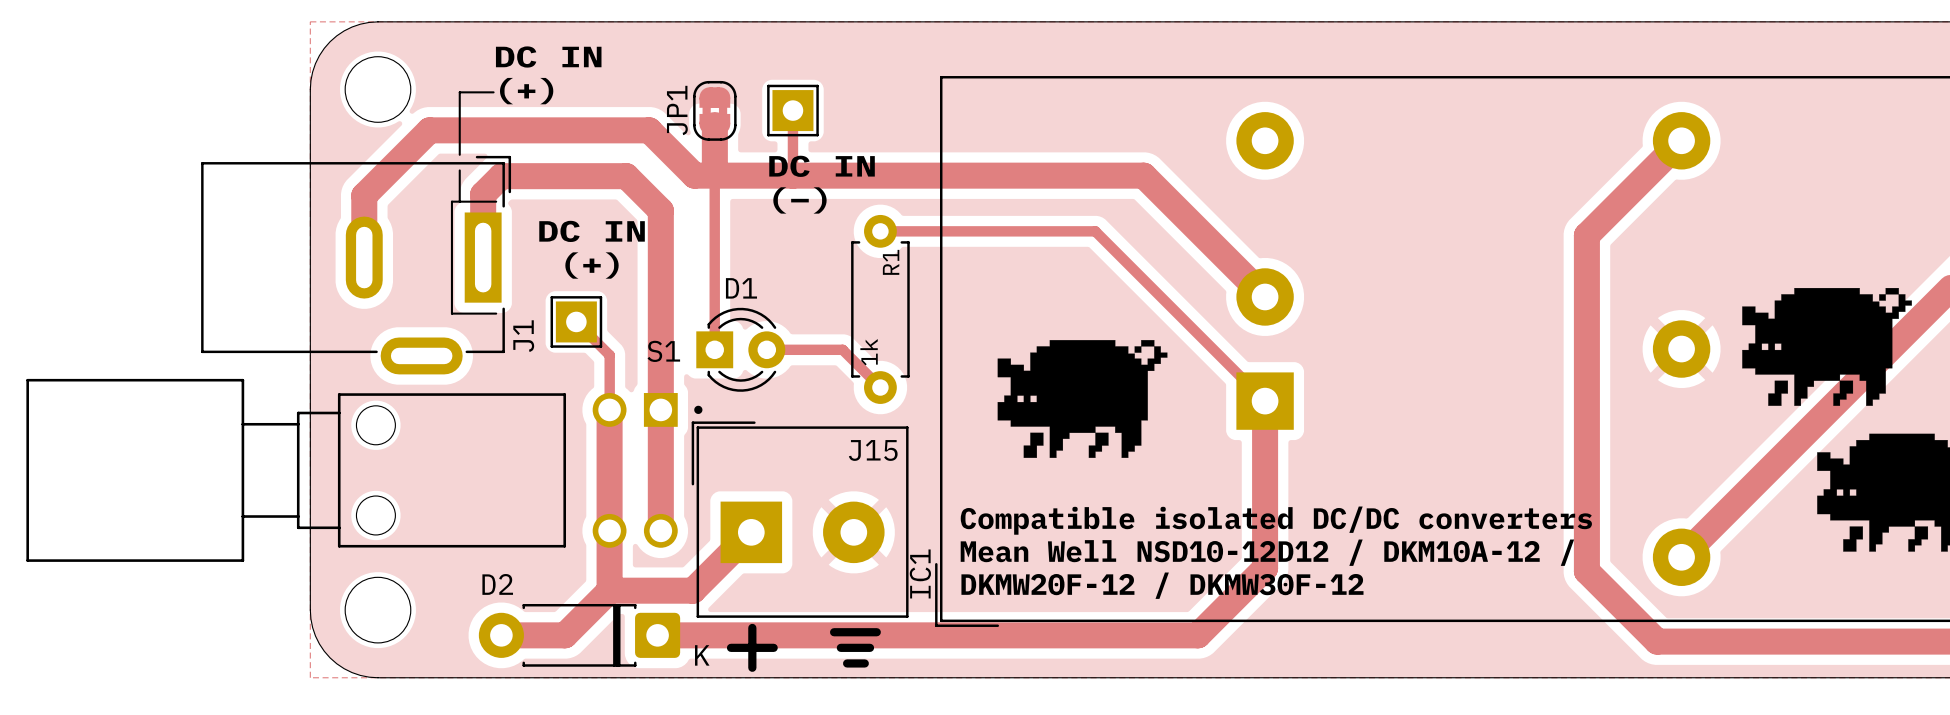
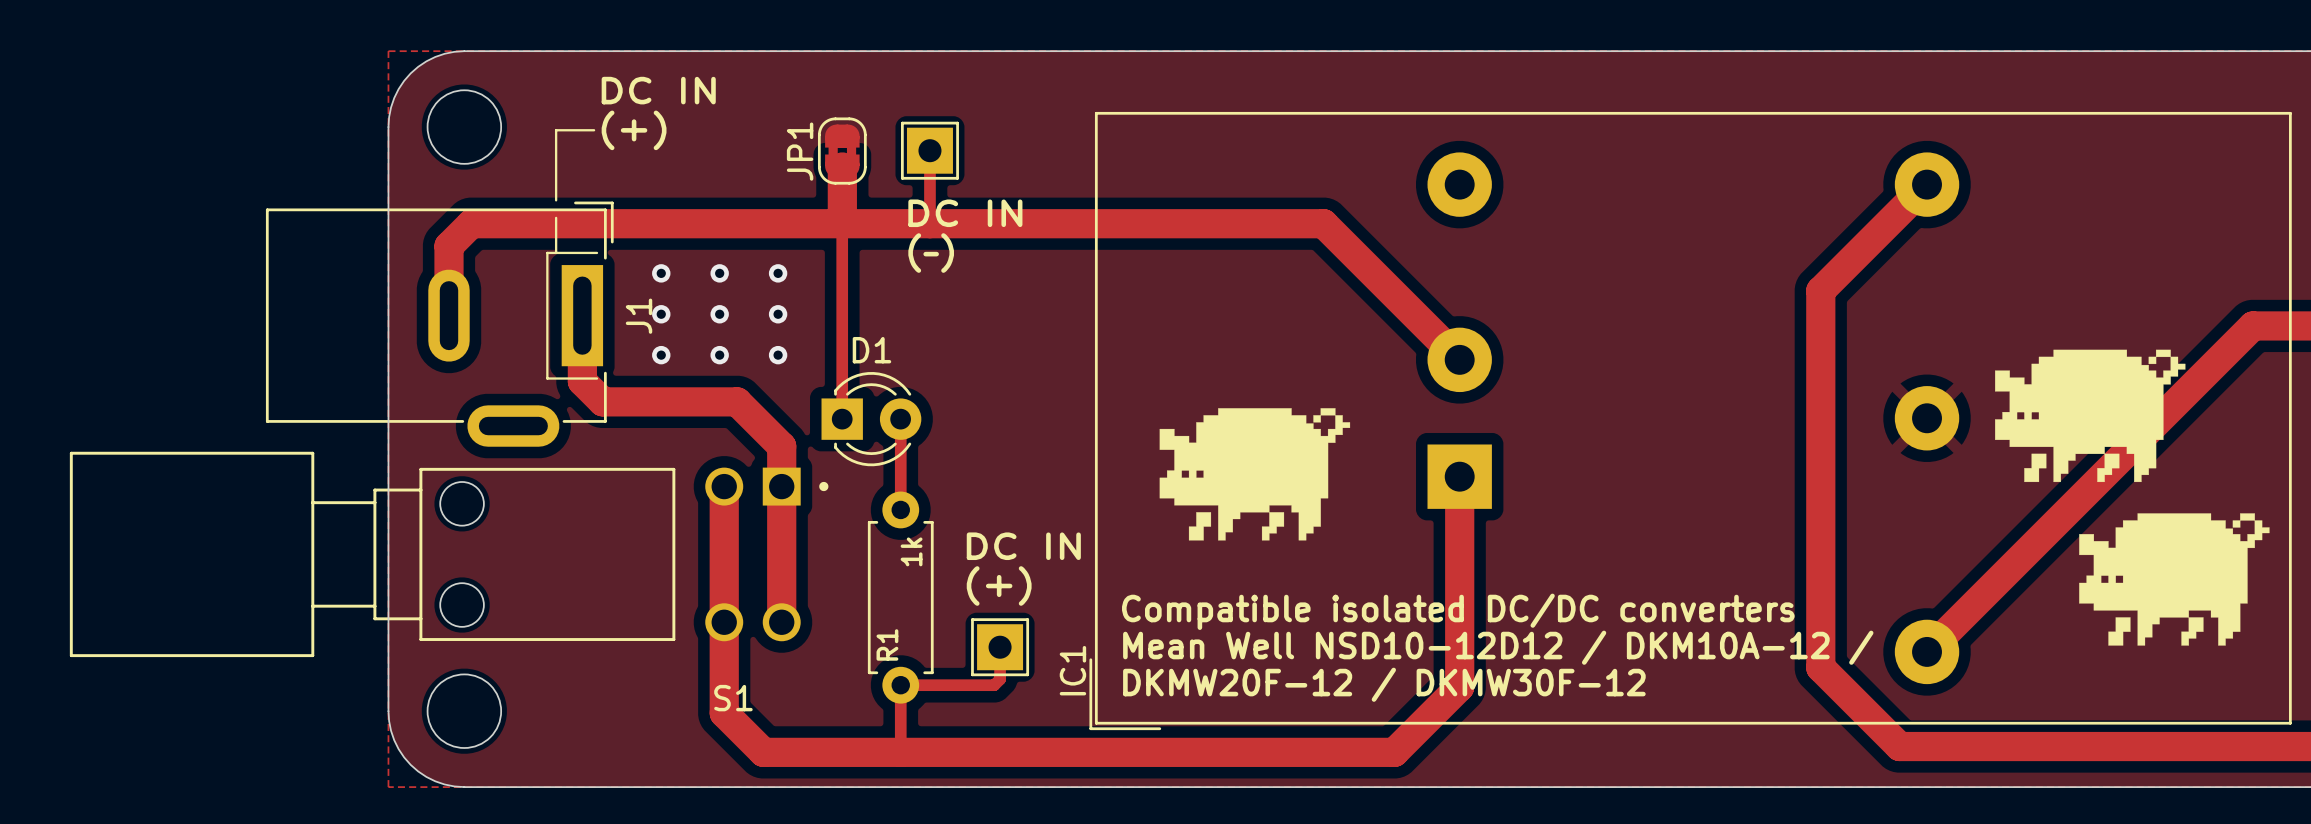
track: (384, 175) (429, 130) (649, 130) (694, 175) -> (471, 223) (819, 223)
via: none -> (661, 273)
via: none -> (719, 273)
via: none -> (778, 273)
text position: DC IN (592, 231) -> DC IN (1023, 546)
track: (880, 231) (1095, 231) (1265, 401) -> none
via: none -> (661, 314)
via: none -> (719, 314)
via: none -> (778, 314)
track: (483, 257) (483, 194) (501, 176) (626, 176) (660, 210) (660, 374) -> (582, 315) (582, 381) (602, 401) (737, 401) (781, 446)
R1 name position: R1 (891, 262) -> R1 (887, 644)
text position: (+) (591, 265) -> (+) (999, 585)
via: none -> (661, 355)
via: none -> (719, 355)
via: none -> (778, 355)
R1 position: (880, 309) -> (900, 597)
track: (576, 321) (609, 355) (609, 409) -> none
part position: (576, 321) -> (1000, 647)
J1 name position: J1 (523, 336) -> J1 (639, 316)
track: (766, 349) (842, 349) (880, 387) -> (900, 419) (900, 509)
S1 name position: S1 (663, 351) -> S1 (733, 698)
R1 value position: 1k (869, 352) -> 1k (911, 551)
J15: (800, 519) -> none
track: (751, 532) (692, 590) (609, 590) (564, 635) (501, 635) -> none
track: none -> (1000, 647) (1000, 679) (994, 685) (900, 685) (900, 752)
track: (1265, 568) (1198, 635) (657, 635) -> (1459, 664) (1459, 687) (1394, 752) (763, 752) (724, 713) (724, 689)
line: (752, 627) (752, 667) -> none
line: (834, 632) (876, 632) -> none
D2: (579, 635) -> none
line: (731, 647) (773, 647) -> none
line: (840, 647) (870, 647) -> none
line: (847, 663) (864, 663) -> none

